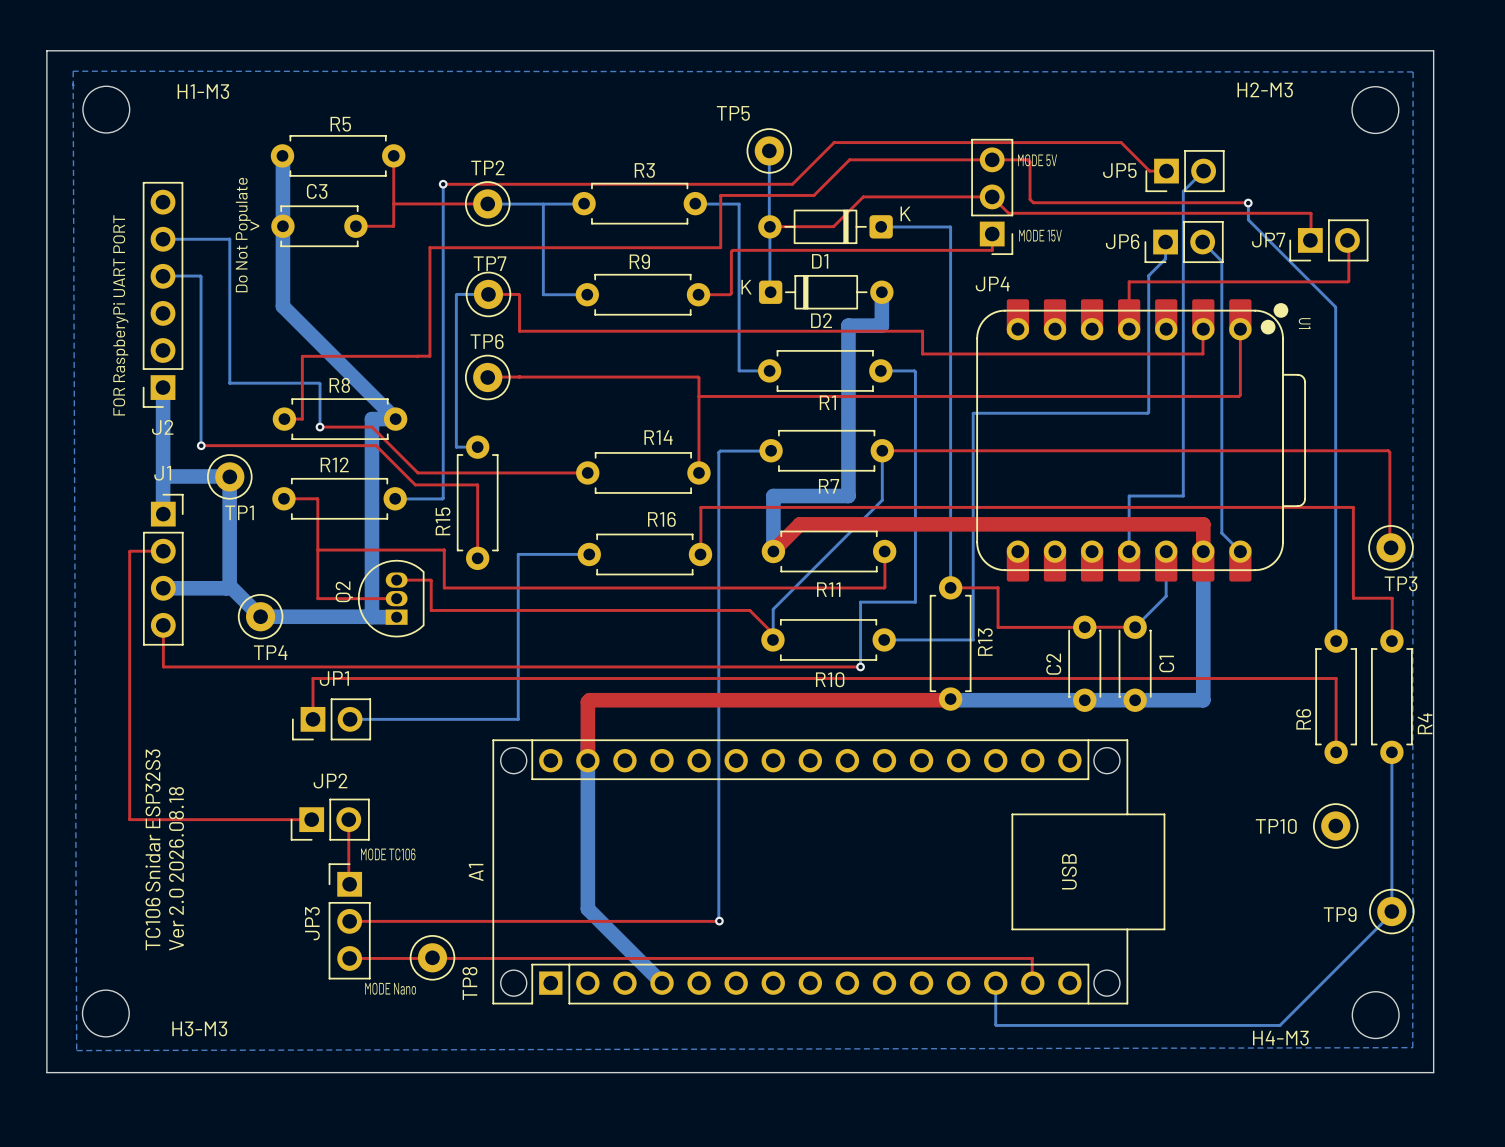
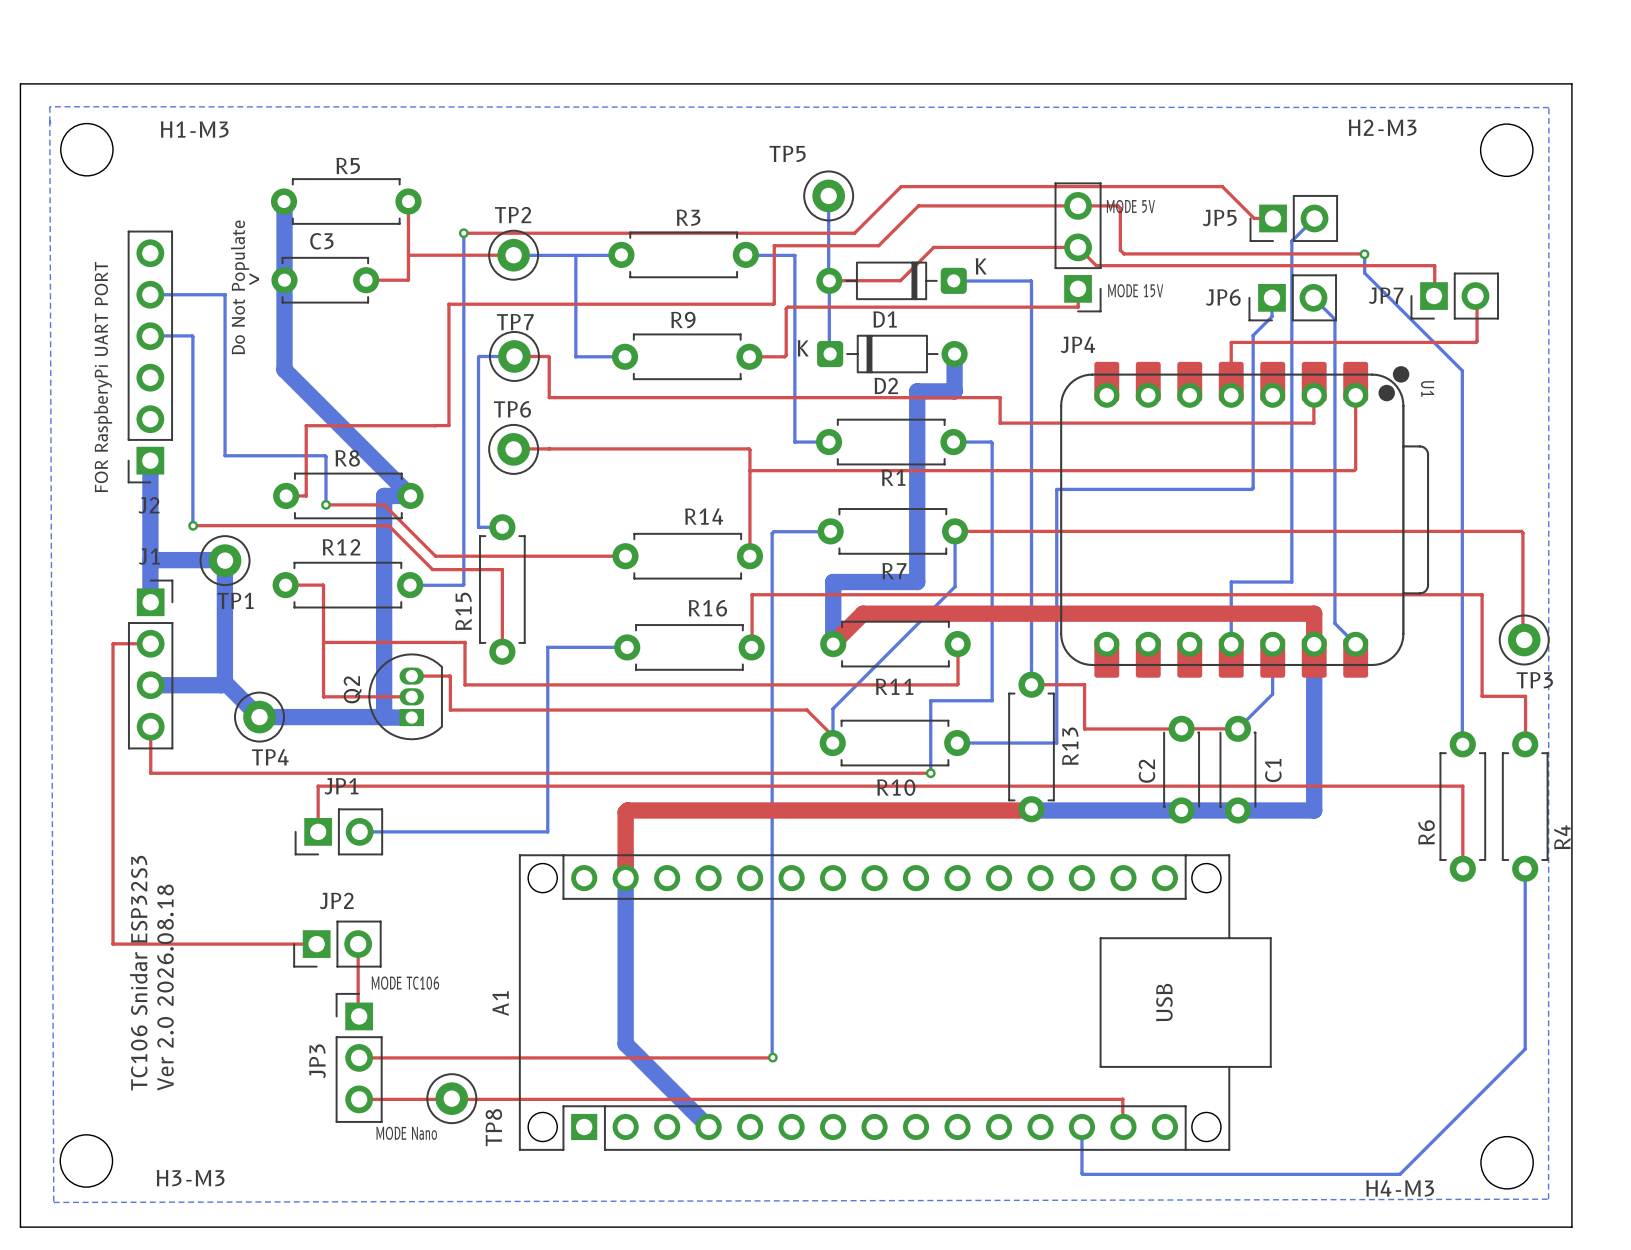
TP10: (1335, 825) -> none
TP9: (1391, 911) -> none

